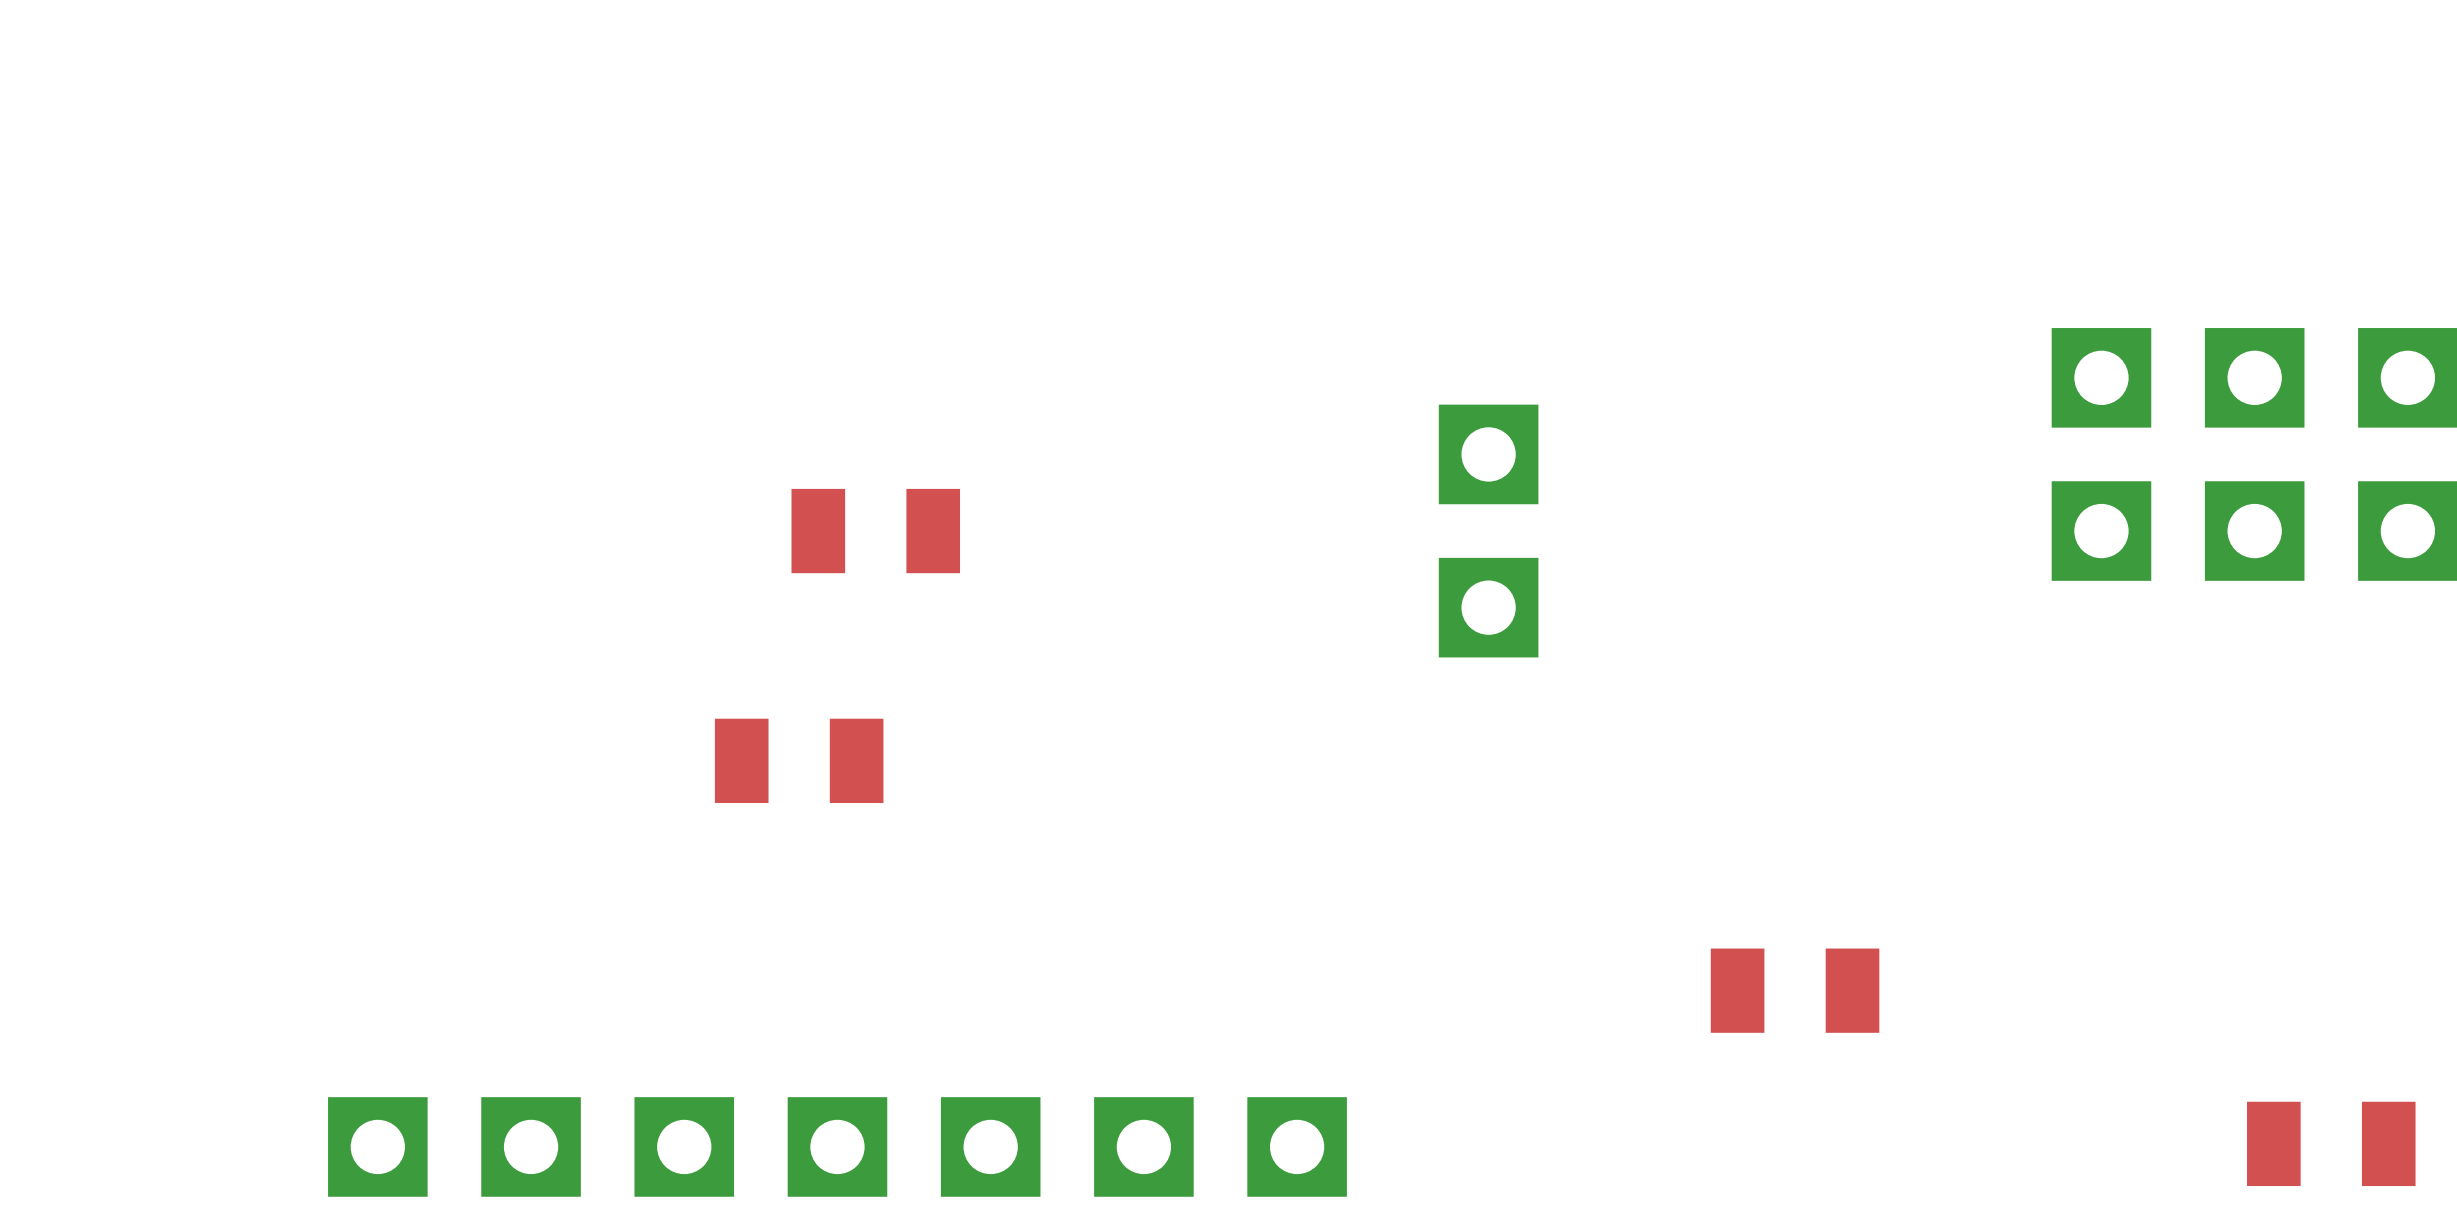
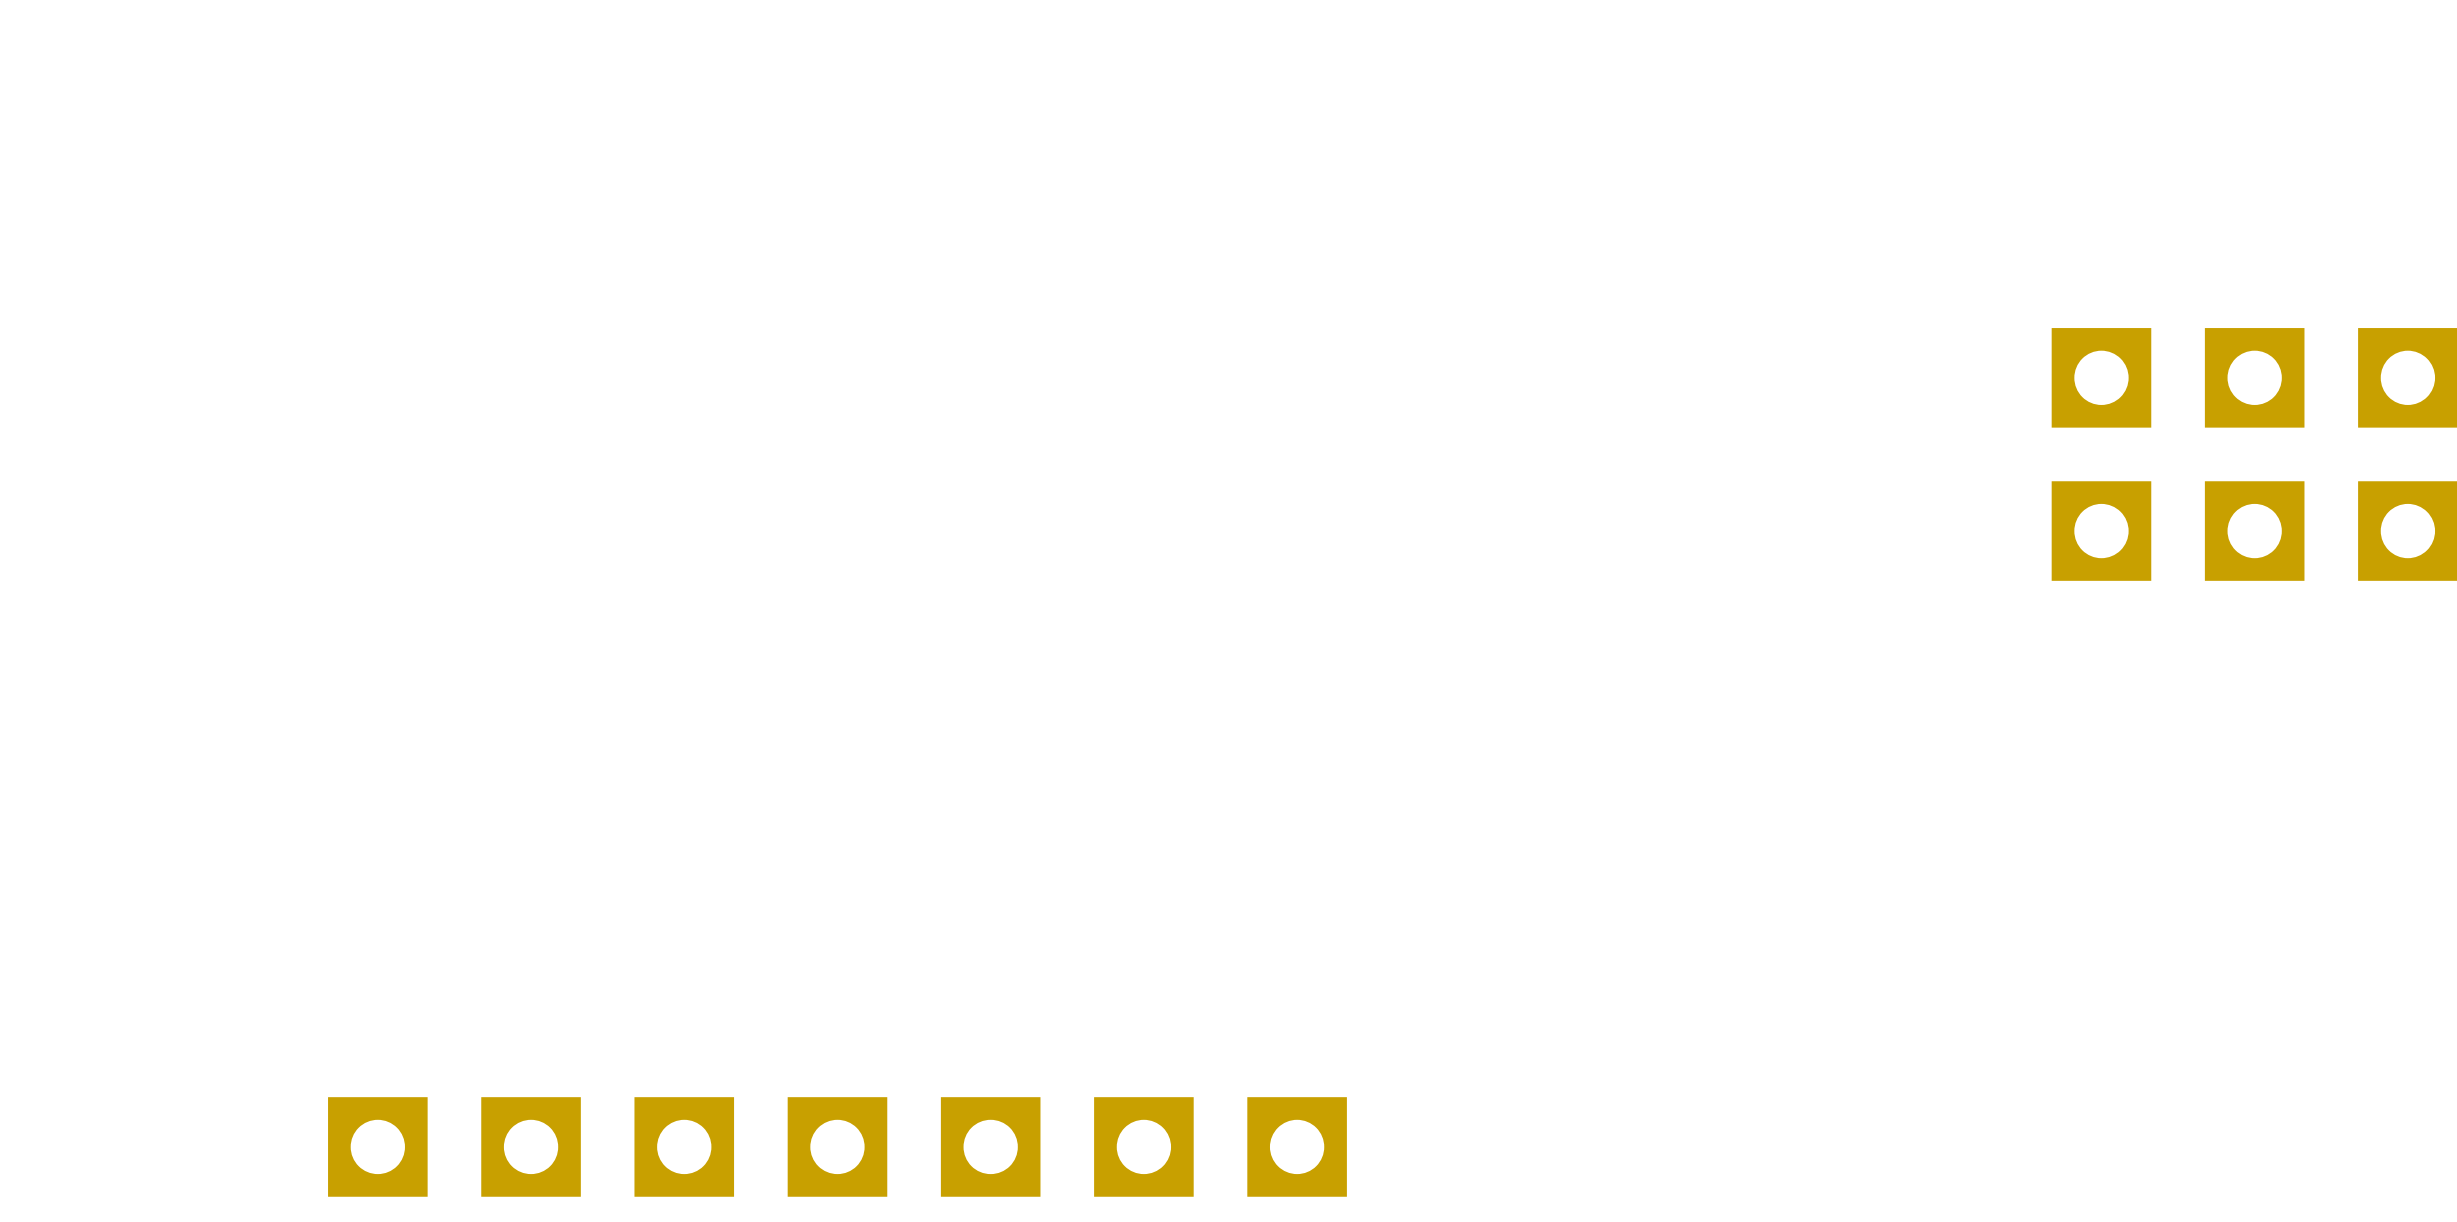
part: (875, 531) -> none
part: (1488, 531) -> none
part: (799, 760) -> none
part: (1795, 990) -> none
part: (2331, 1143) -> none

